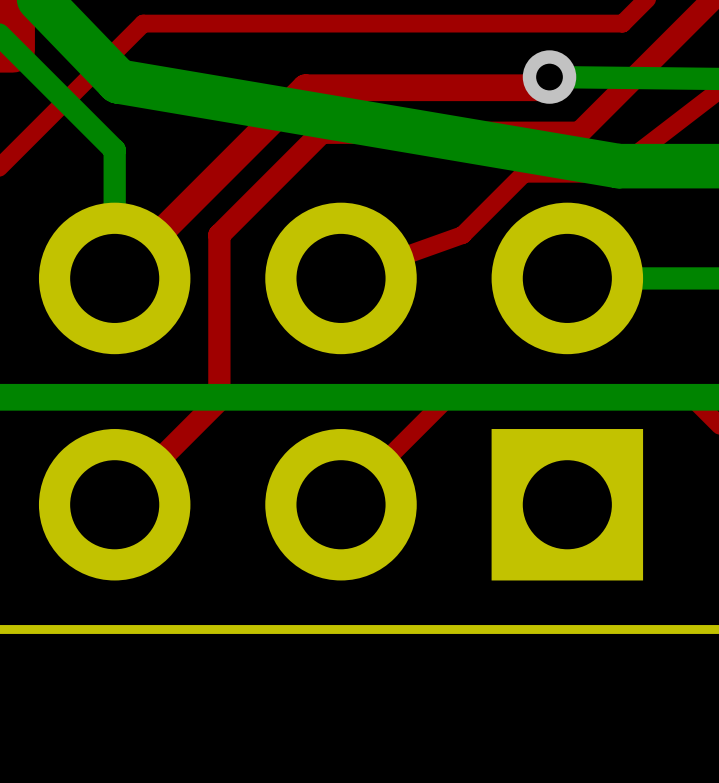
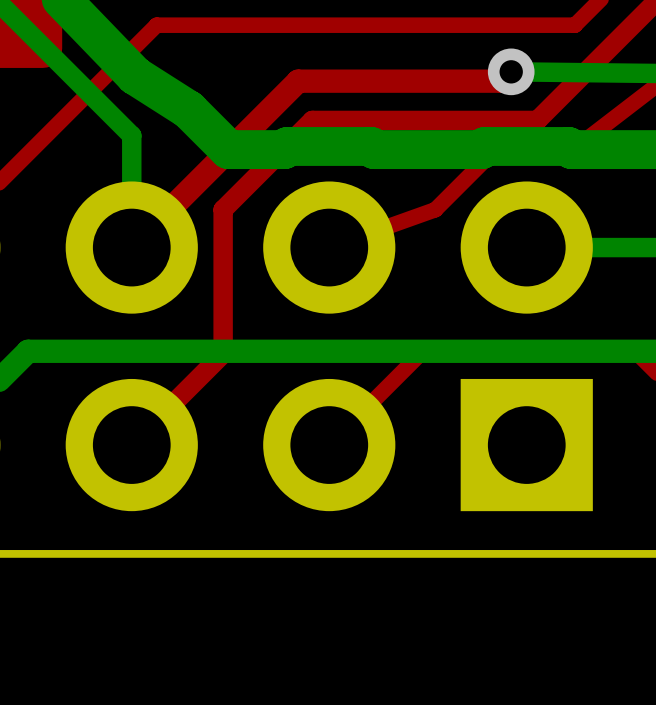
bottom track: (118, 81) (618, 166) -> (135, 75) (188, 109) (228, 149) (284, 149) (287, 146) (371, 146) (374, 149) (481, 149) (484, 146) (568, 146) (571, 149)

